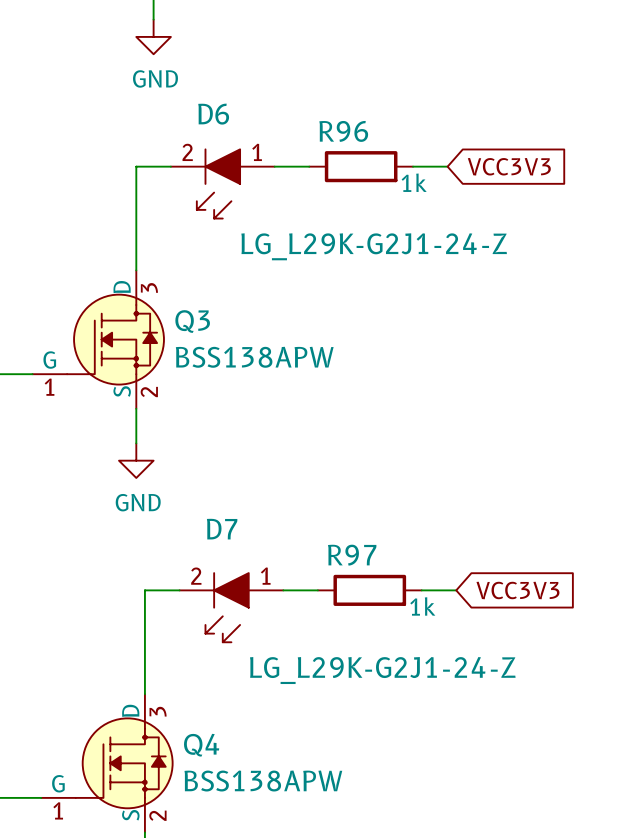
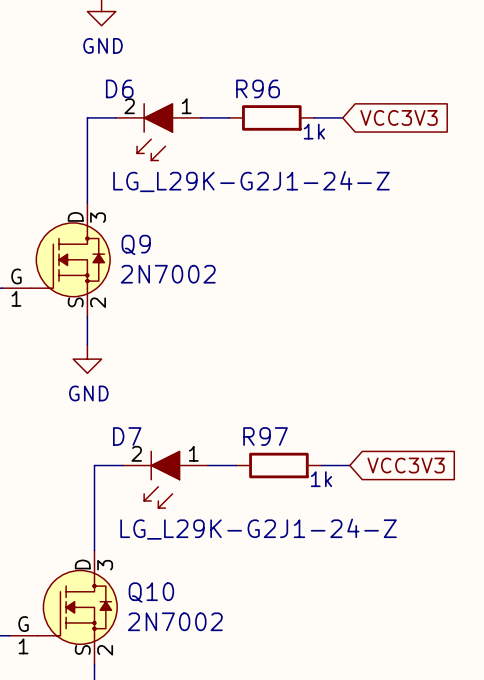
D6 name position: D6 (213, 114) -> D6 (119, 88)
Q3 name: Q3 (192, 321) -> Q9 (136, 244)
Q3 value: BSS138APW (254, 357) -> 2N7002 (168, 274)
D7 name position: D7 (222, 529) -> D7 (127, 436)
Q4 name: Q4 (201, 745) -> Q10 (151, 592)
Q4 value: BSS138APW (263, 781) -> 2N7002 (175, 621)

